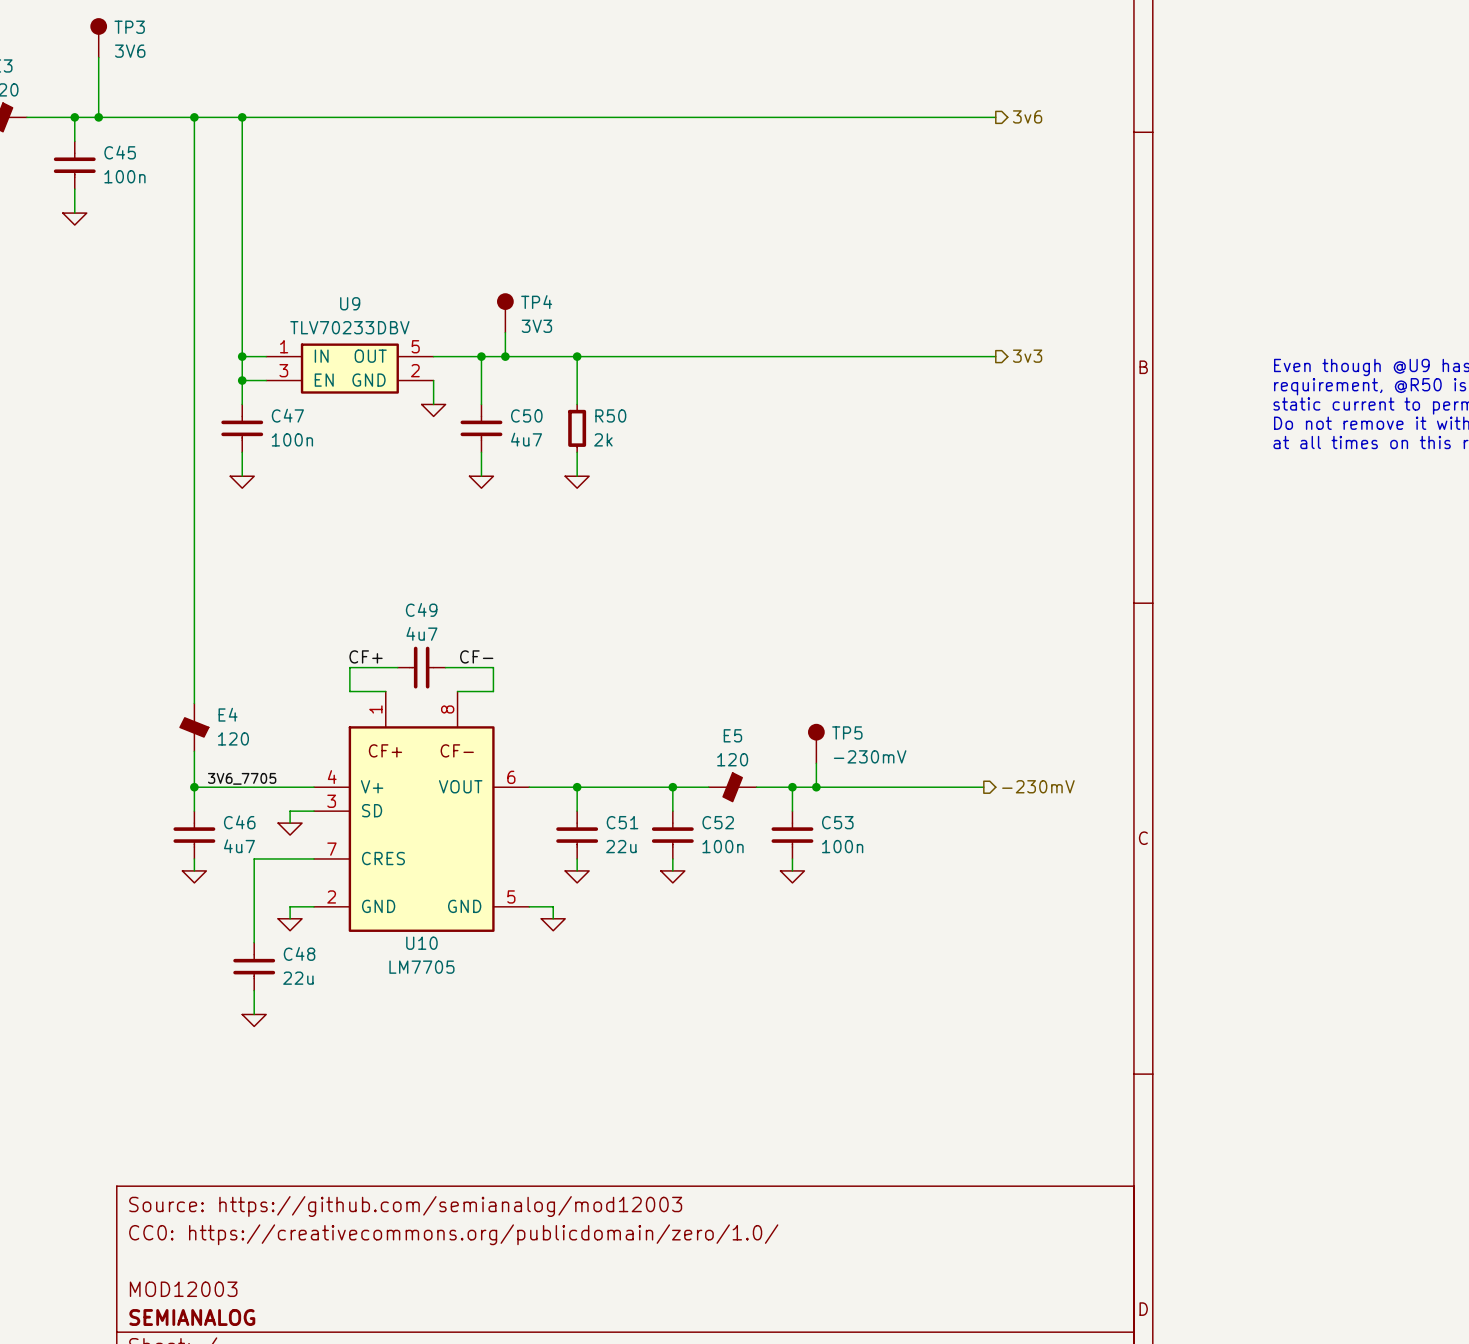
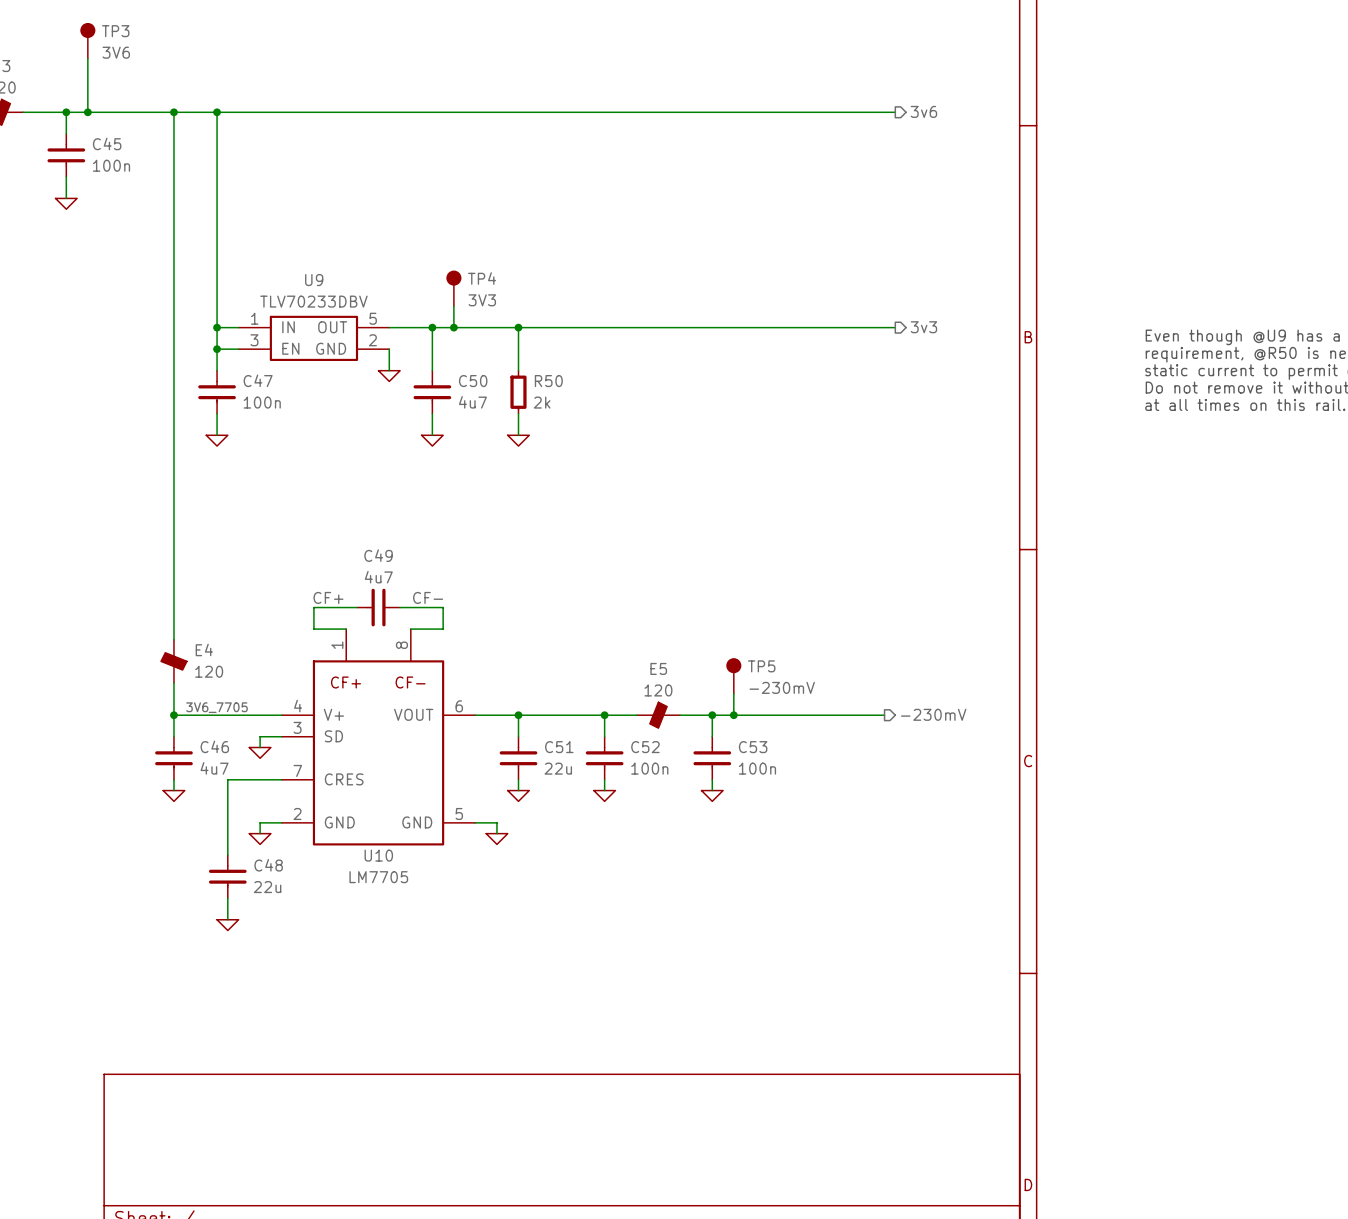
title block: Source: https://github.com/semianalog/mod12003 (405, 1206) -> none
title block: CC0: https://creativecommons.org/publicdomain/zero/1.0/ (453, 1234) -> none
title block: MOD12003 (183, 1289) -> none
title block: SEMIANALOG (192, 1317) -> none

